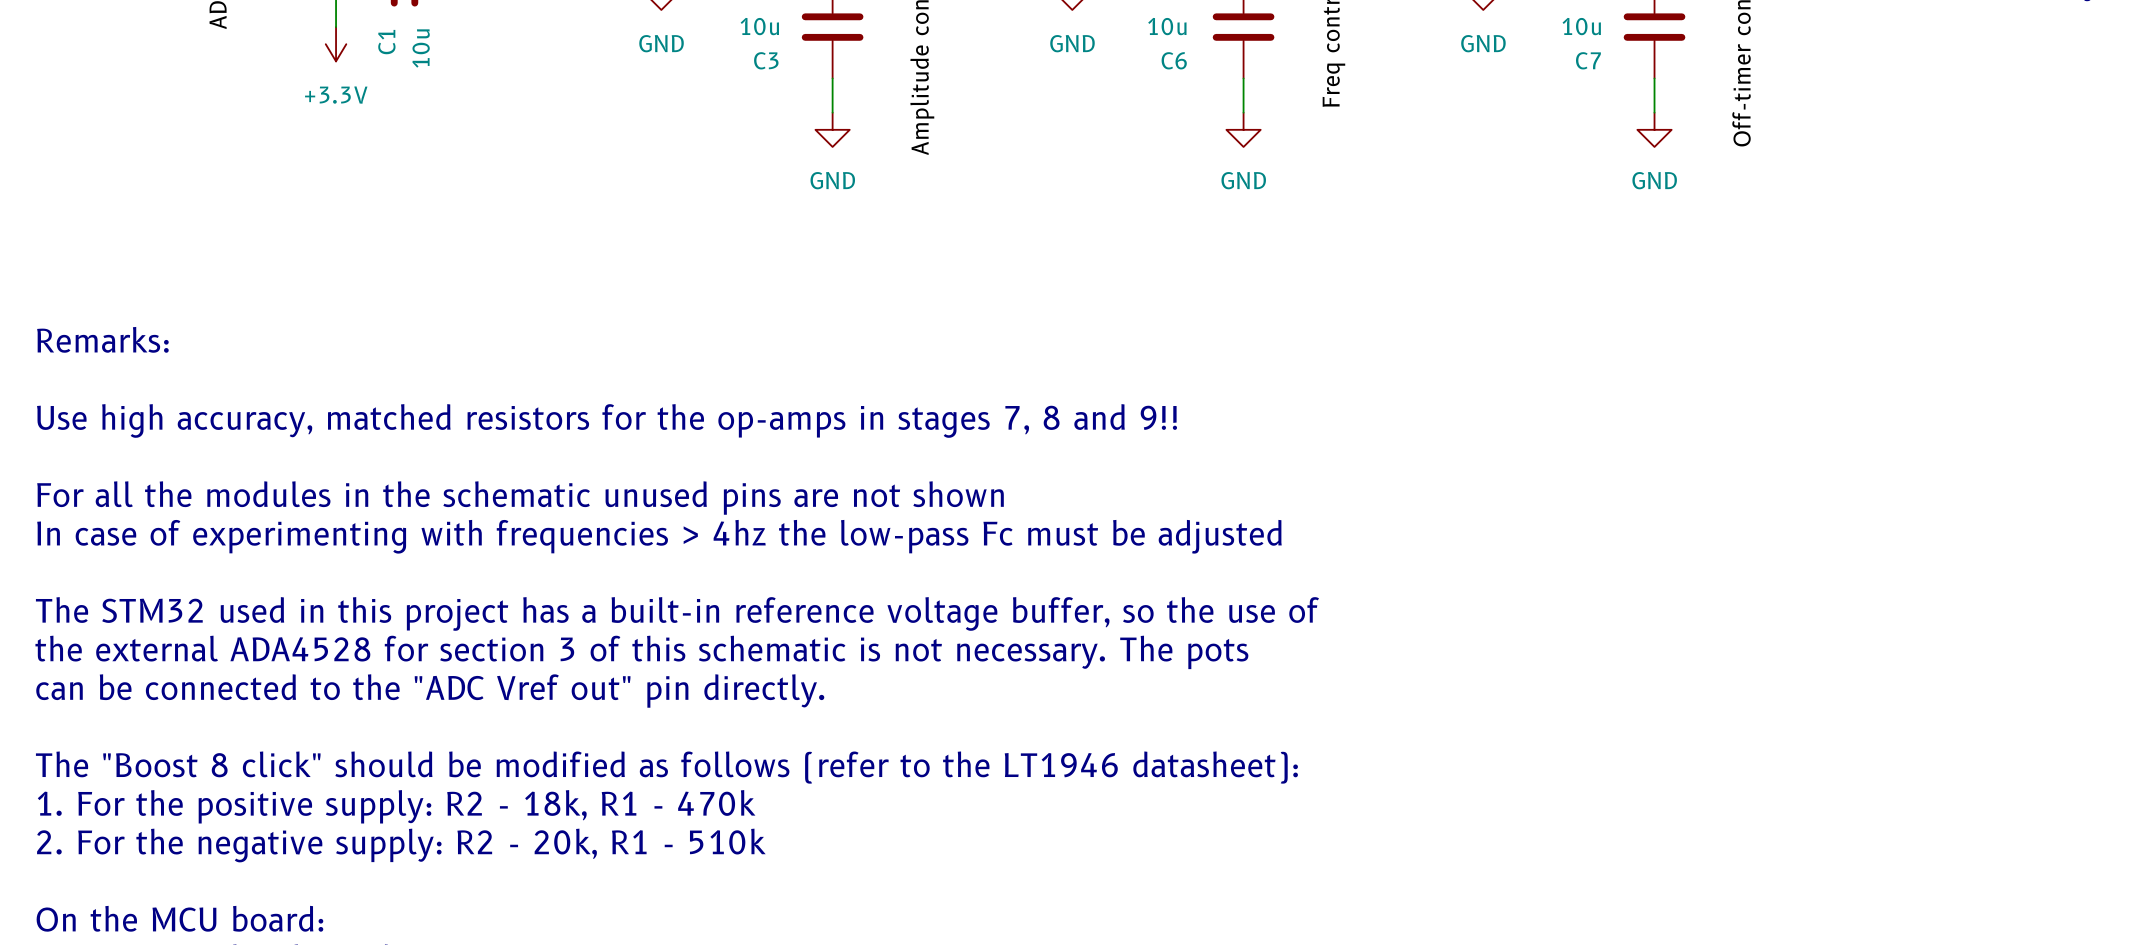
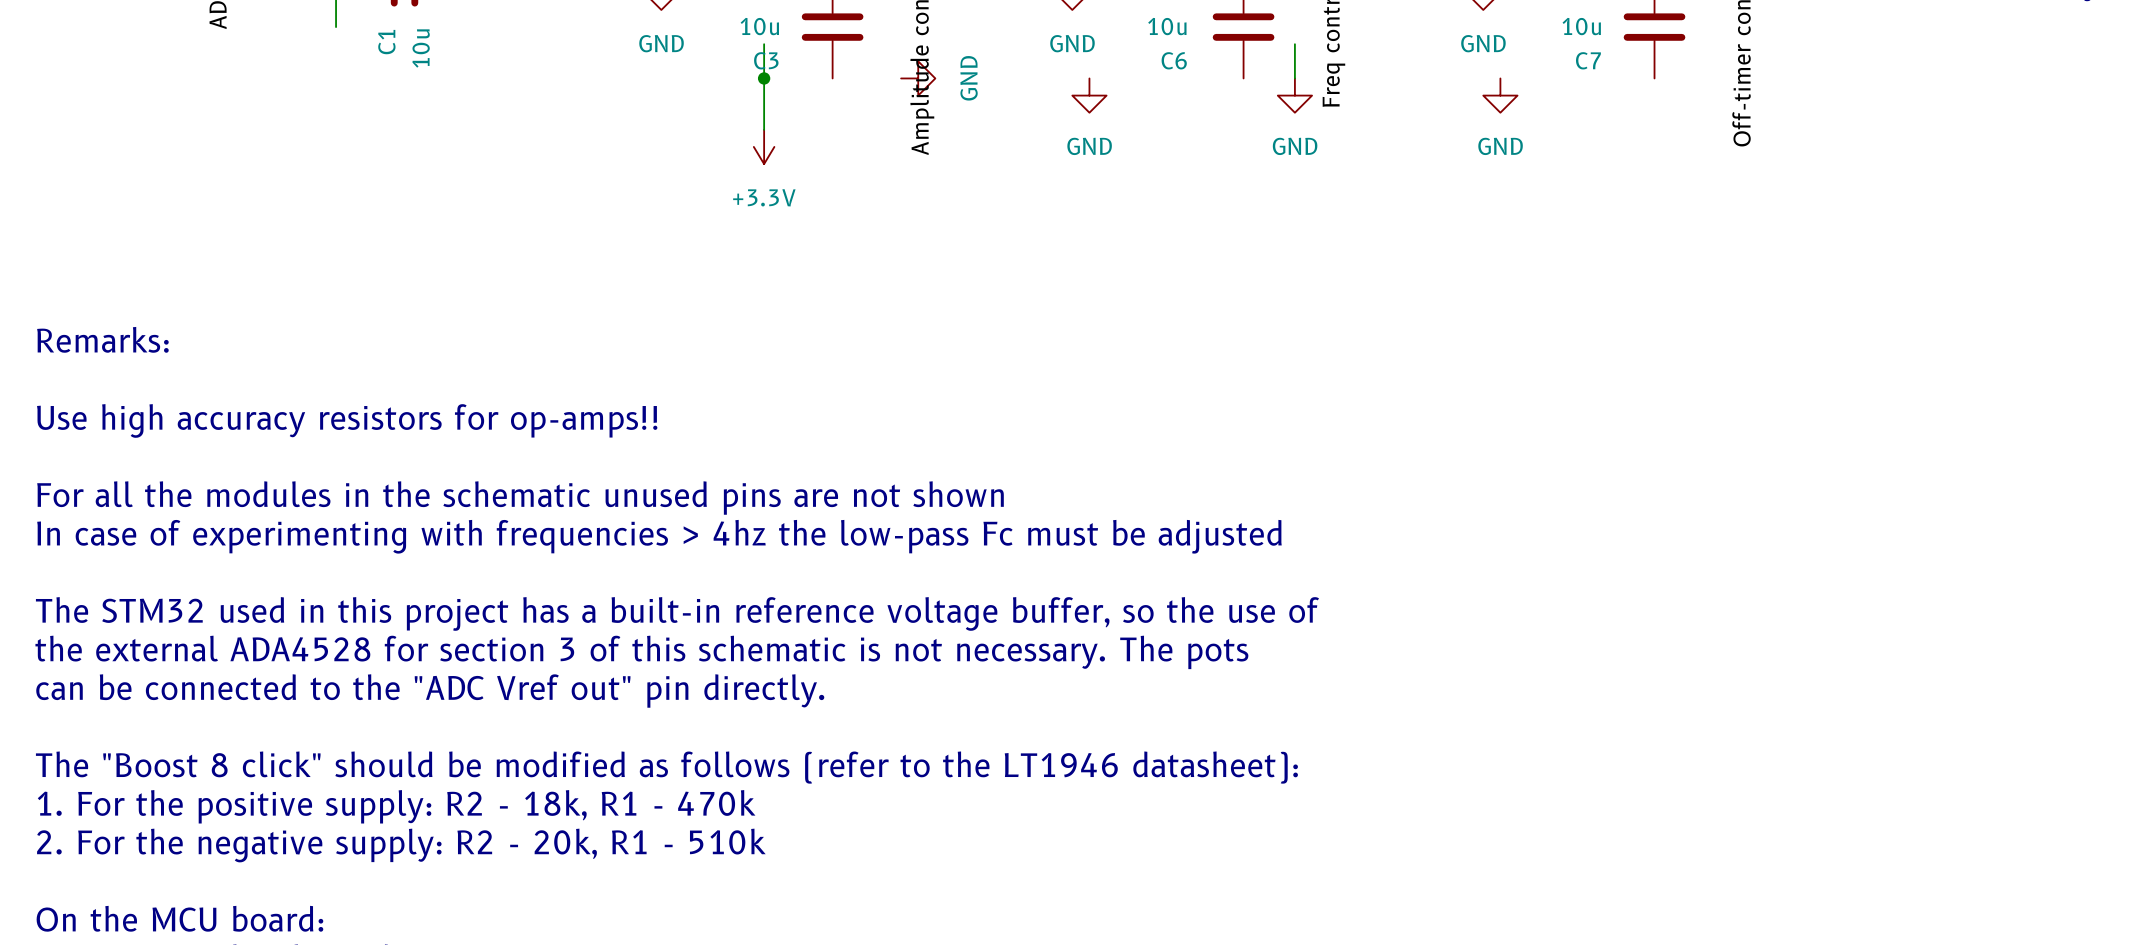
power symbol: +3.3V (336, 44) -> none
wire: none -> (764, 44) (764, 129)
junction: none -> (764, 78)
wire: (832, 78) (832, 112) -> none
wire: (1243, 78) (1243, 112) -> (1294, 44) (1294, 78)
wire: (1654, 78) (1654, 112) -> none
power symbol: none -> GND (1089, 95)
power symbol: none -> GND (1500, 95)
power symbol rotation: 0° (832, 129) -> 90° counterclockwise (918, 78)
power symbol position: GND (832, 129) -> GND (918, 78)
power symbol position: GND (1243, 129) -> GND (1294, 95)
power symbol: GND (1654, 129) -> none
power symbol: none -> +3.3V (764, 146)
text: Use high accuracy, matched resistors for the op-amps in stages 7, 8 and 9!! (607, 420) -> Use high accuracy resistors for op-amps!! (347, 420)

